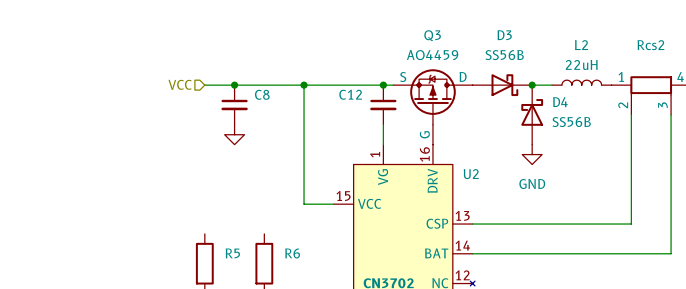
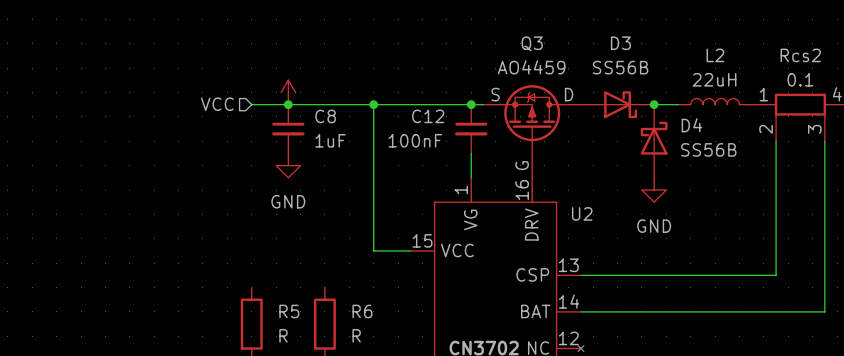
Rcs2 value: none -> 0.1 (800, 79)
power symbol: none -> (288, 92)
C8 value: none -> 1uF (330, 140)
C12 value: none -> 100nF (415, 140)
power symbol text: none -> GND (288, 201)
R5 value: none -> R (283, 335)
R6 value: none -> R (356, 335)

